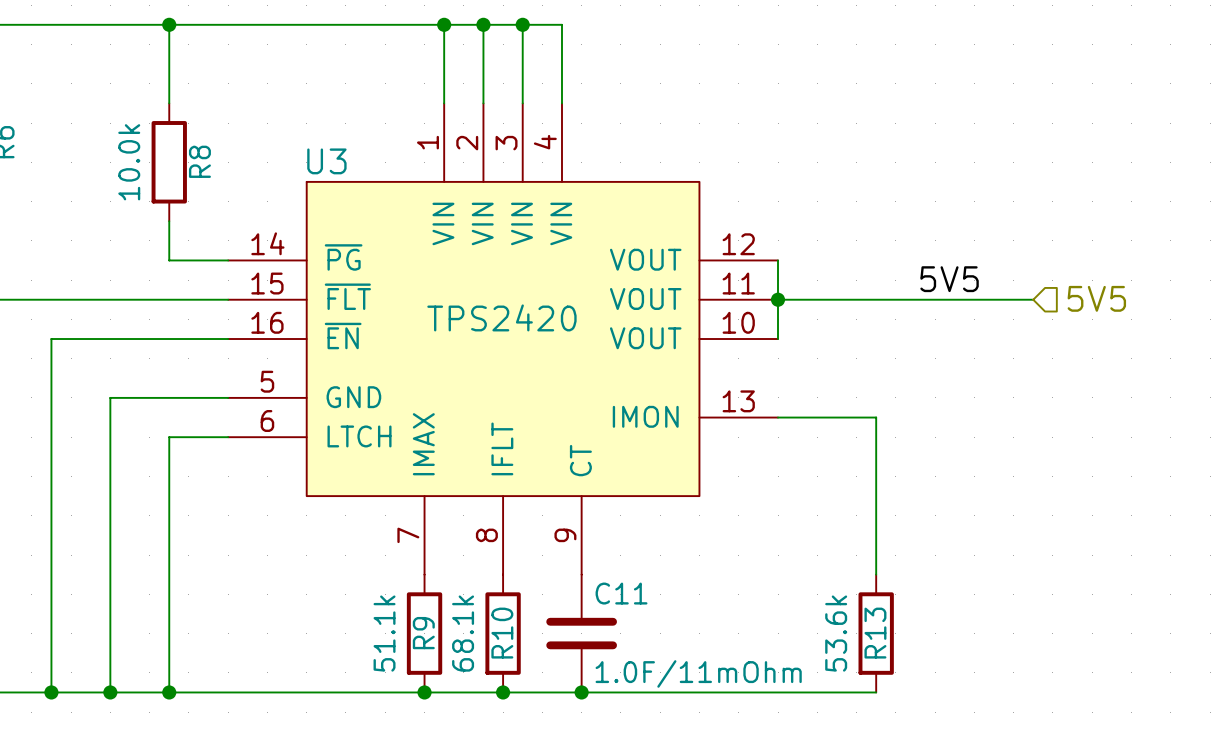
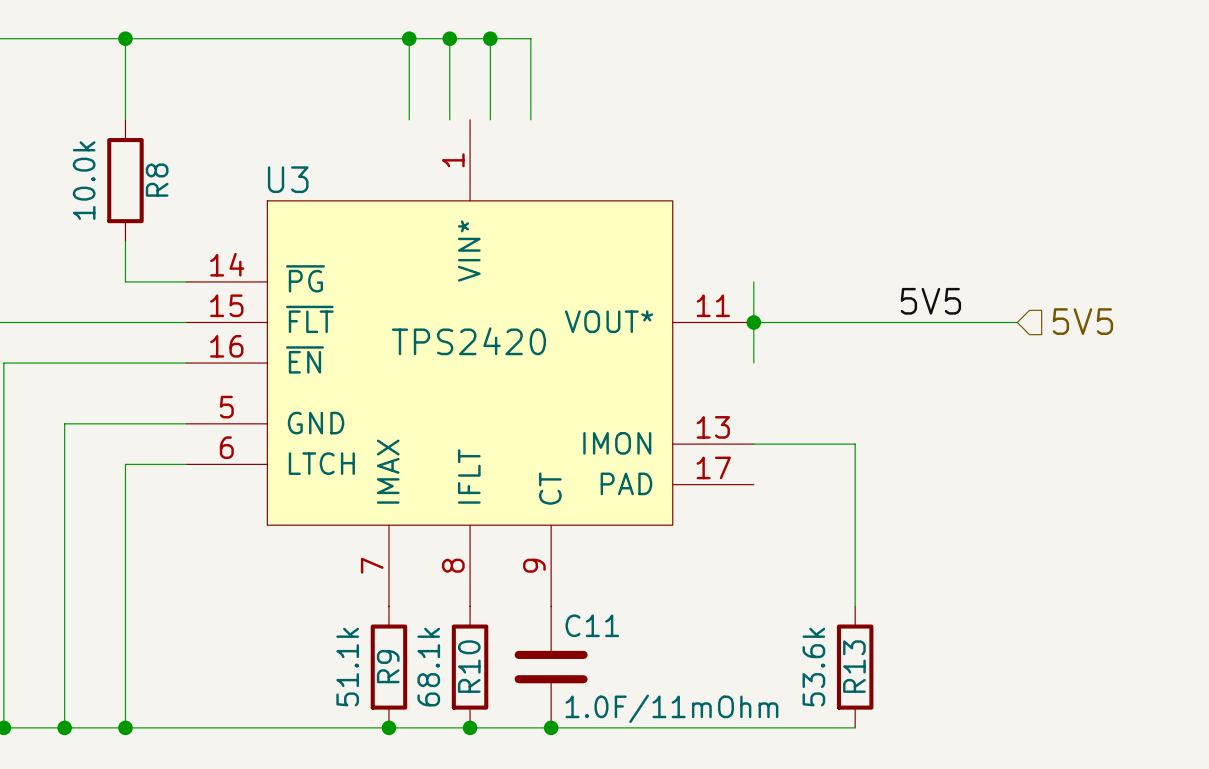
U3 symbol: [228, 103, 779, 575] -> [186, 119, 754, 607]

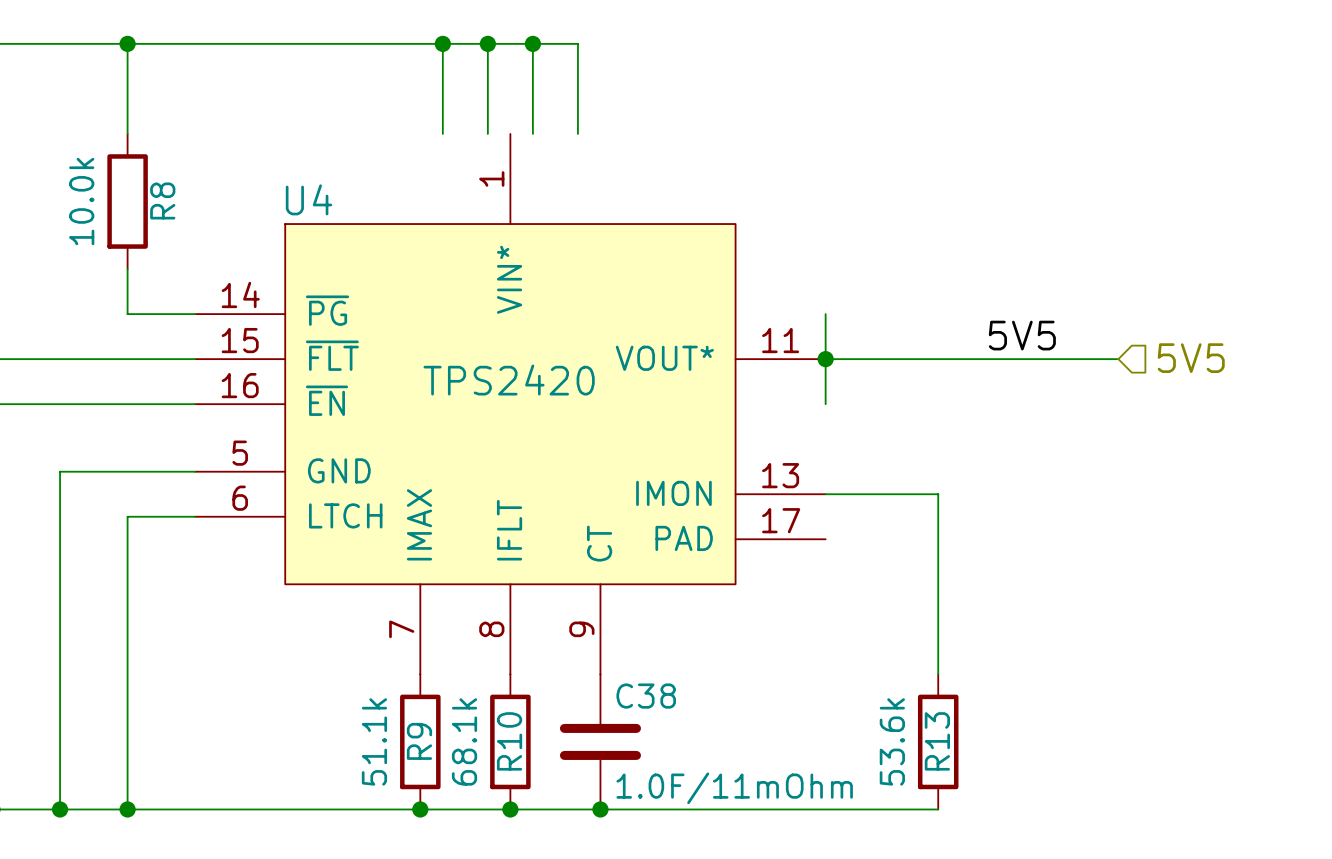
U3 name: U3 (288, 179) -> U4 (309, 199)
C11 name: C11 (592, 625) -> C38 (646, 696)

